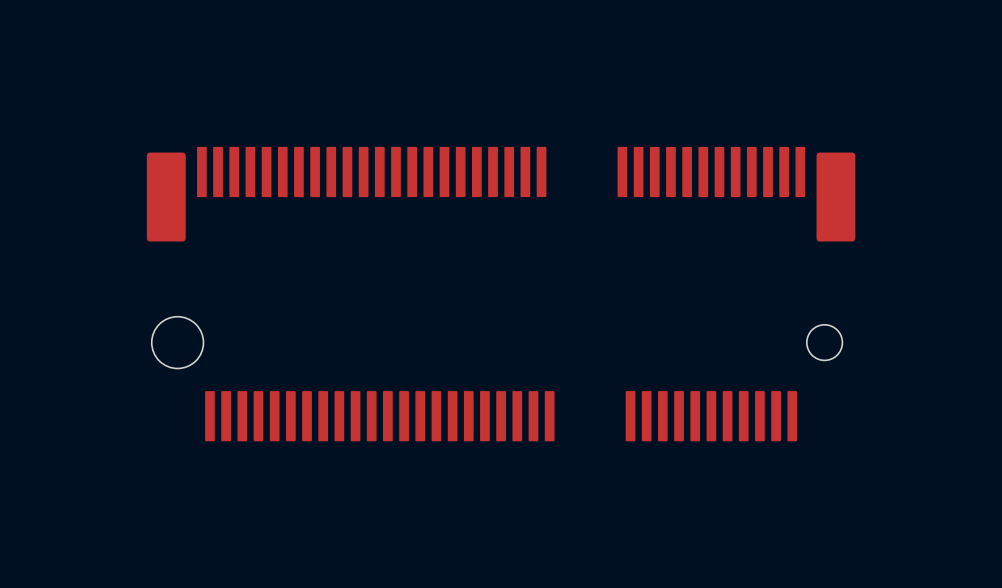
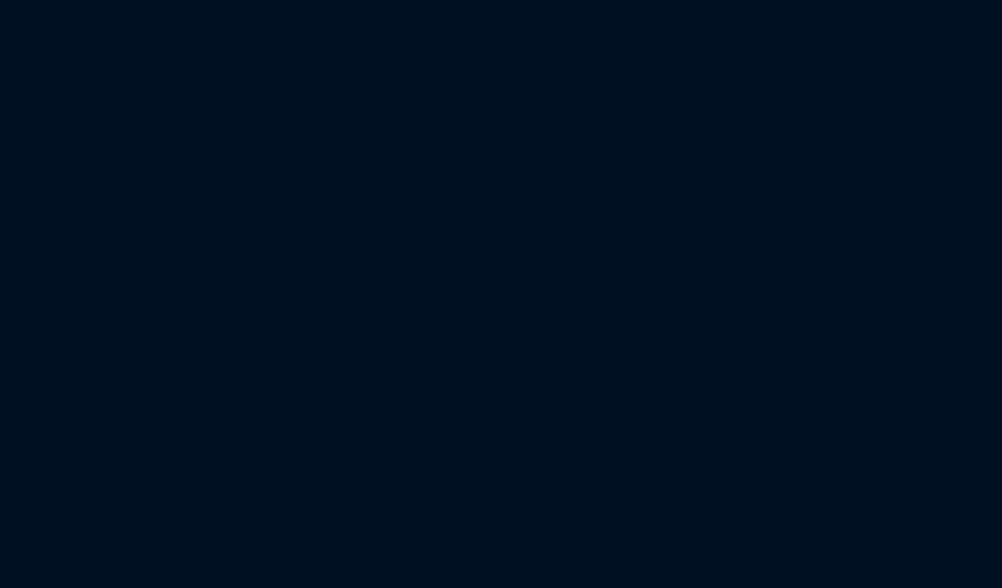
part: (501, 294) -> none

